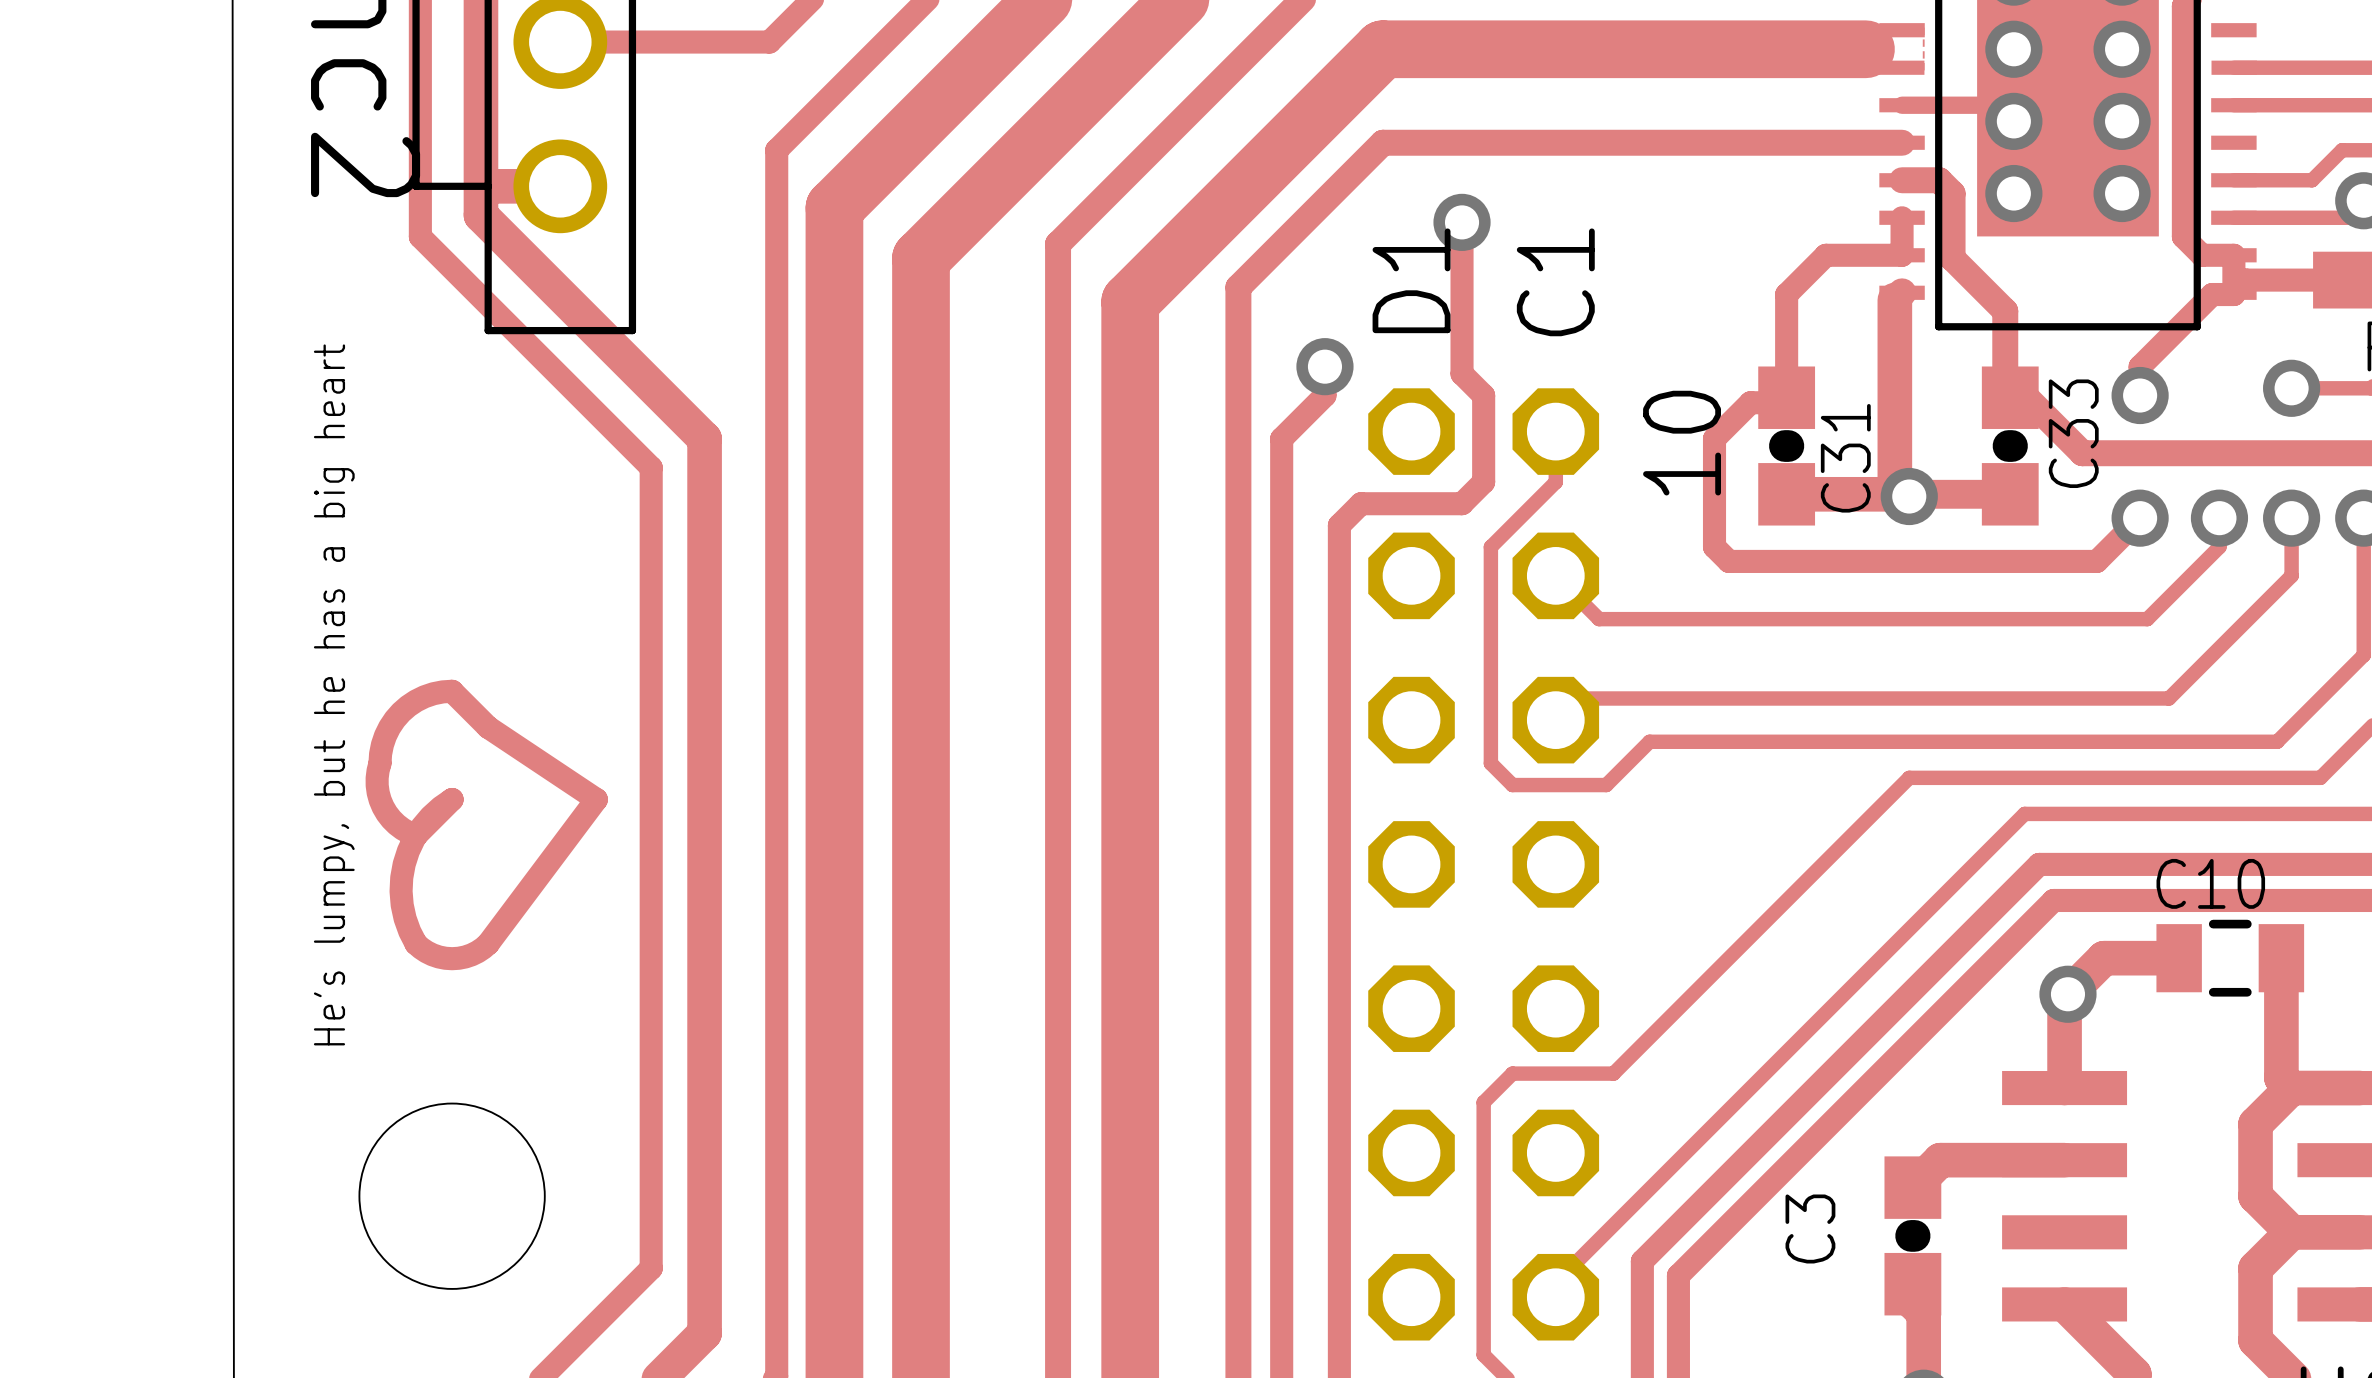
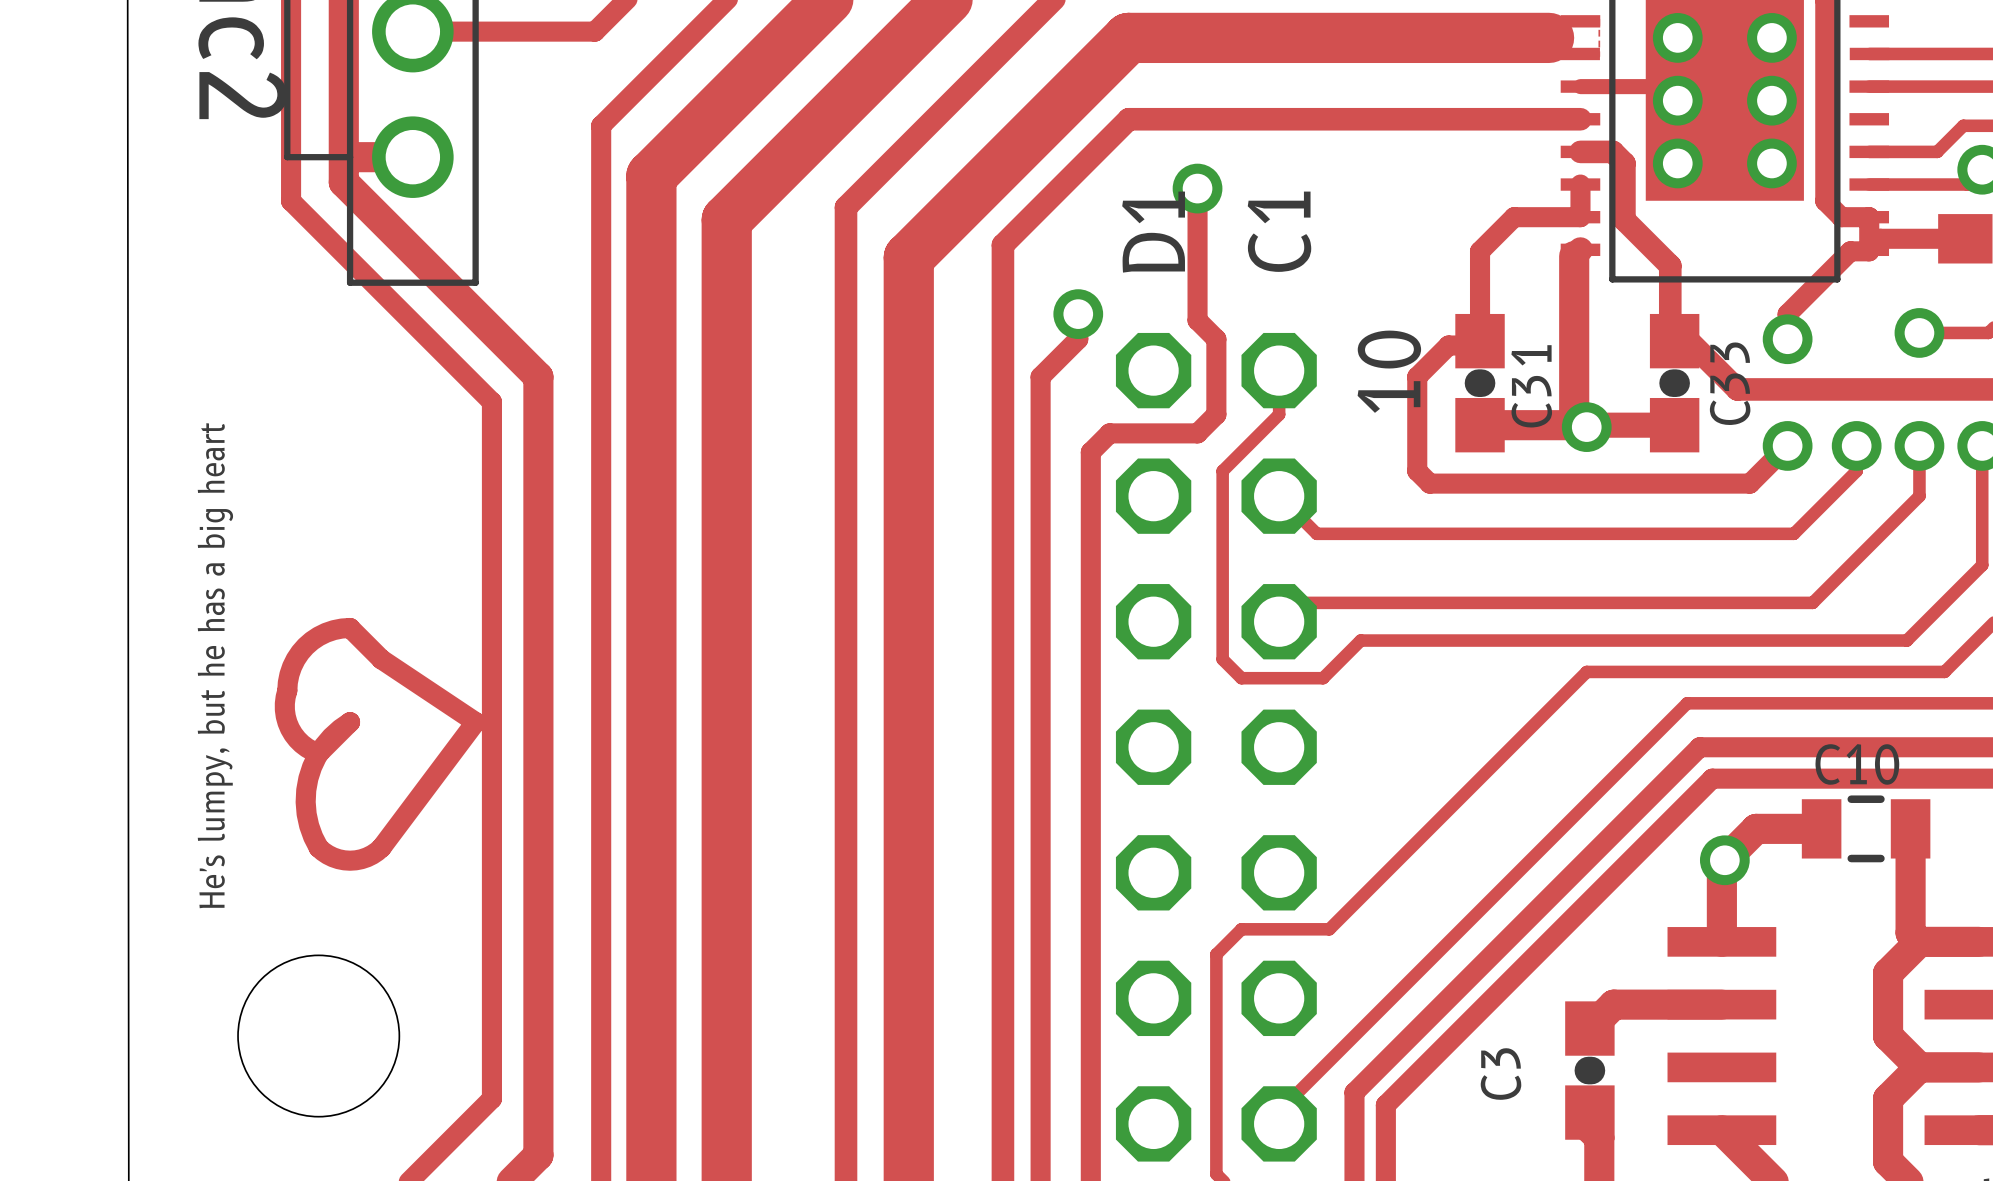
track: (452, 691) (488, 727) (596, 799) (488, 943) (471, 954) (452, 958) (432, 954) (416, 943) (405, 918) (401, 891) (404, 864) (414, 838) (421, 827) (430, 816) (452, 799) (416, 835) (396, 824) (386, 813) (380, 800) (377, 778) (382, 744) (394, 719) (416, 700) (433, 693) (452, 691) -> (350, 627) (381, 659) (475, 722) (381, 847) (367, 857) (350, 860) (333, 857) (318, 847) (309, 825) (305, 802) (308, 778) (317, 756) (323, 746) (331, 737) (350, 722) (318, 753) (301, 743) (293, 734) (285, 716) (284, 703) (289, 674) (300, 652) (311, 640) (326, 632) (350, 627)

